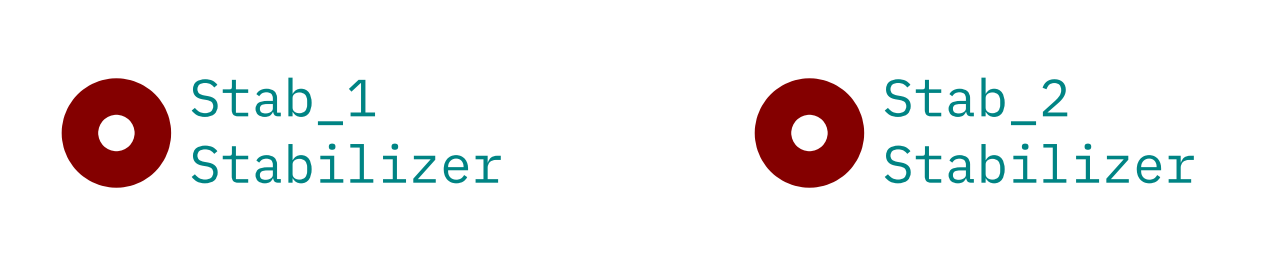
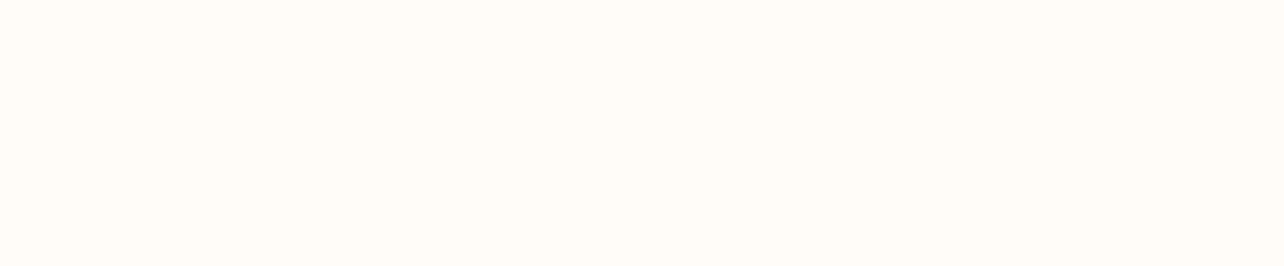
Stab_1: Stabilizer (116, 133) -> none
Stab_2: Stabilizer (809, 133) -> none

